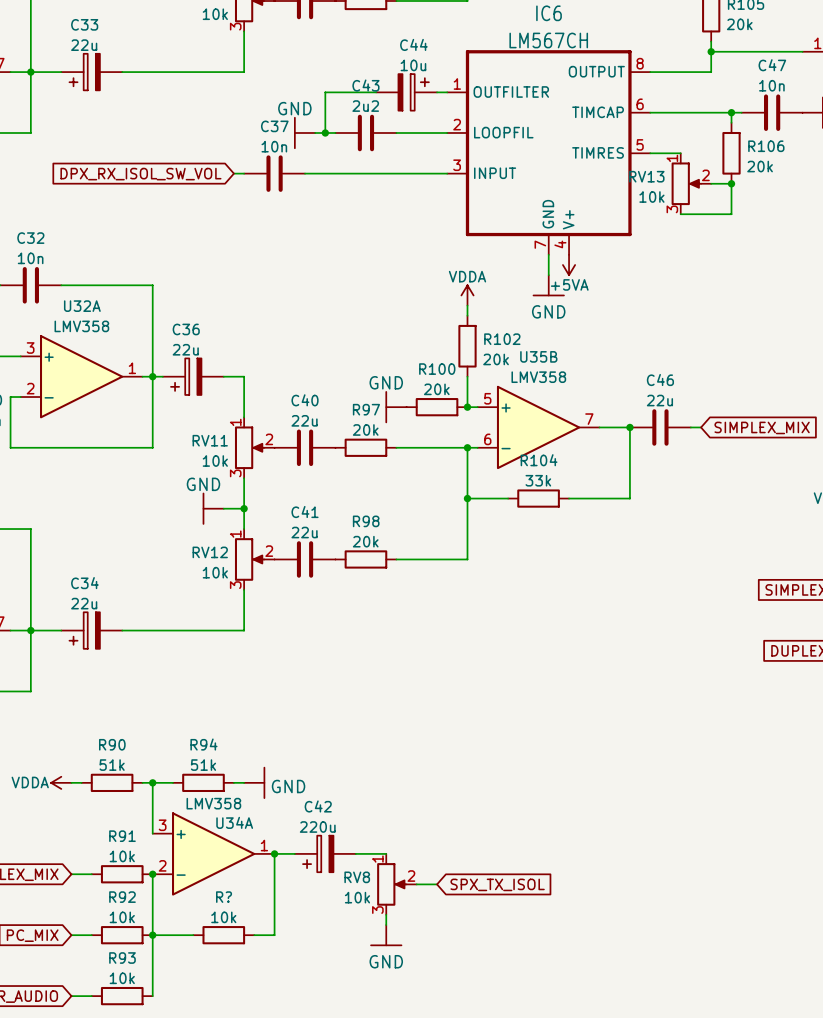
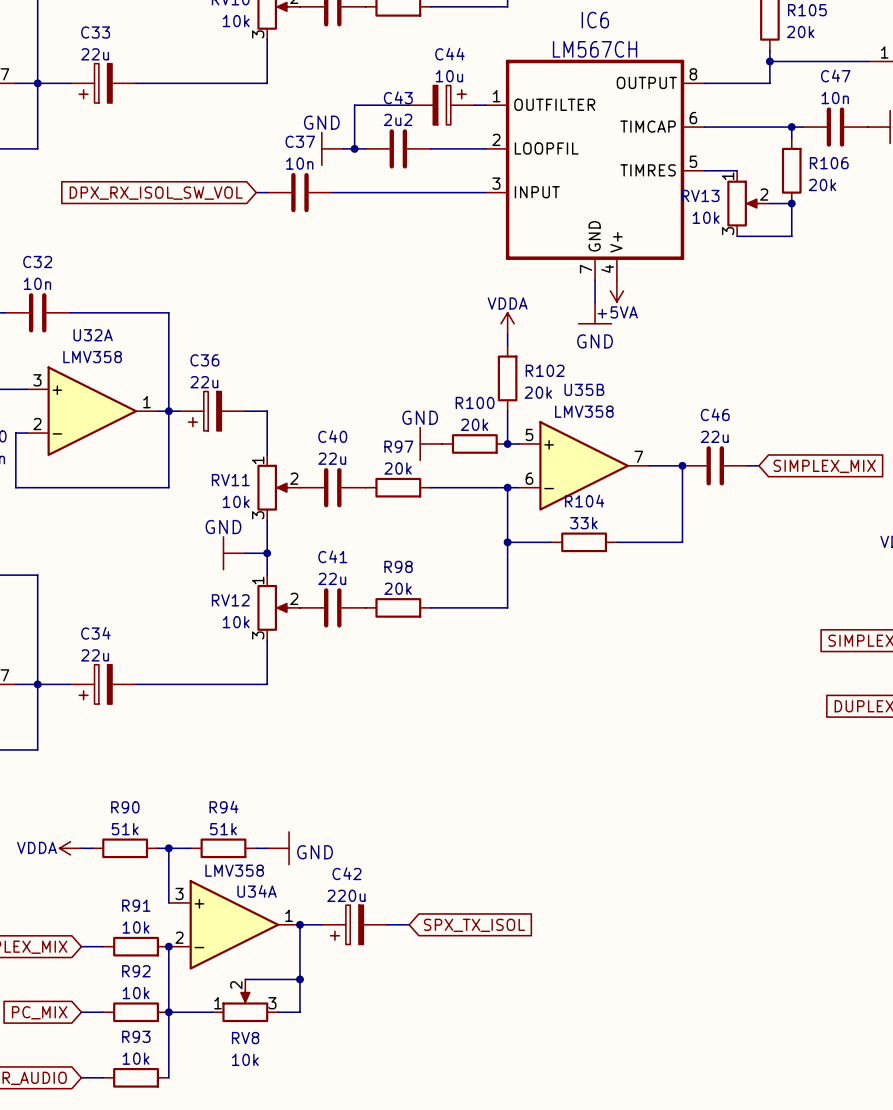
wire: (376, 853) (386, 853) -> none
RV8 rotation: 0° (391, 884) -> 90° counterclockwise (245, 1006)
RV8 position: (396, 884) -> (245, 1000)
wire: (416, 884) (437, 884) -> none
global label position: SPX_TX_ISOL (497, 884) -> SPX_TX_ISOL (474, 925)
RV8 value position: 10k (357, 897) -> 10k (245, 1059)
wire: none -> (245, 979) (299, 979)
junction: none -> (299, 979)
wire: (386, 914) (386, 925) -> none
R?: 10k (223, 935) -> none
power symbol: GND (386, 935) -> none

